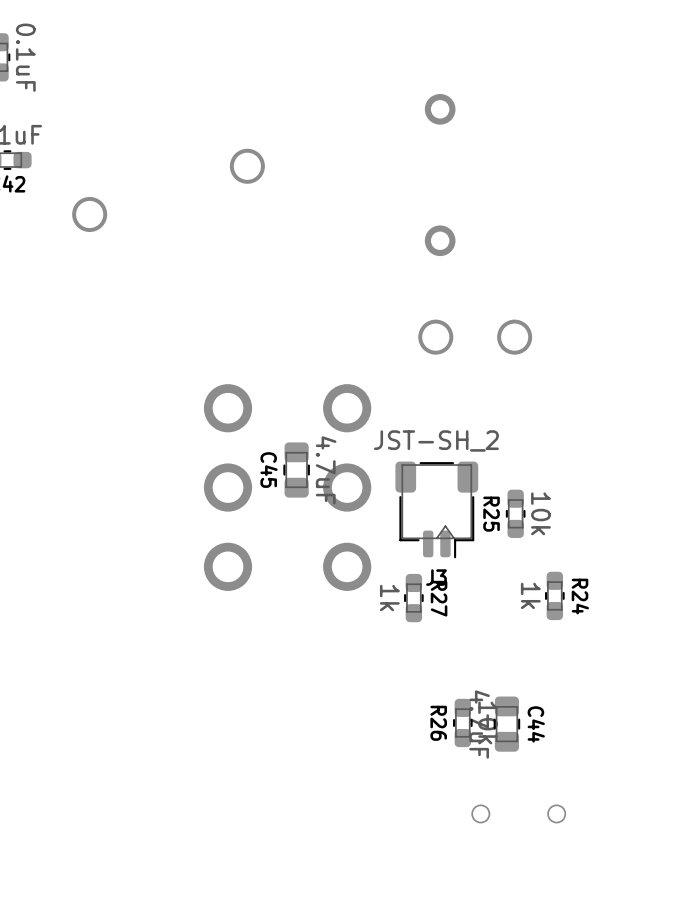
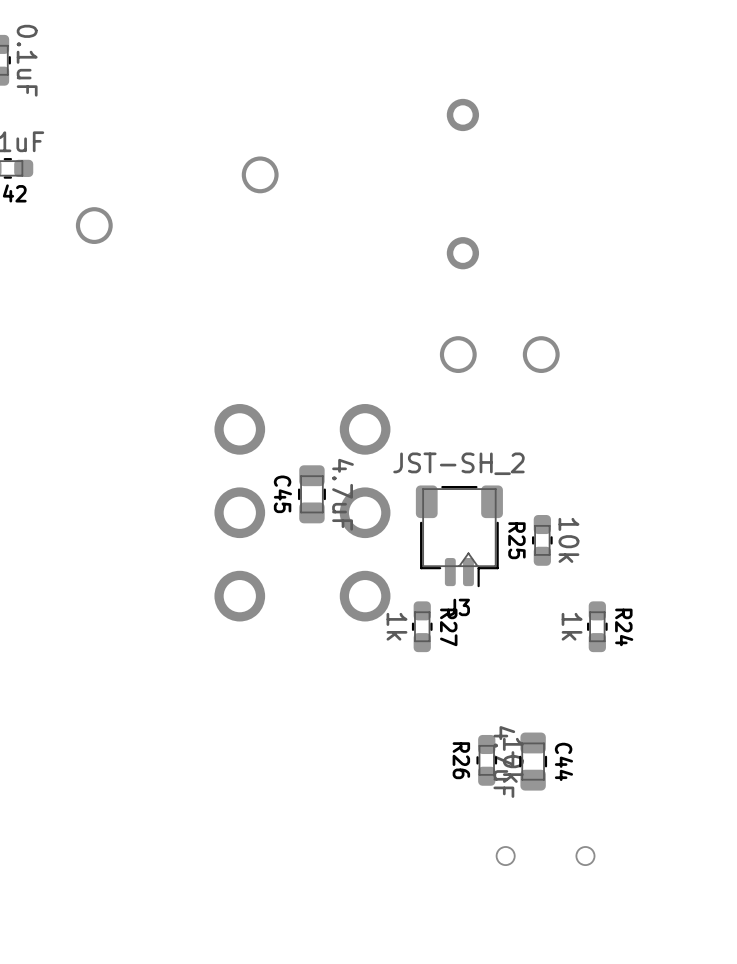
R24 position: (554, 595) -> (597, 626)
R27 position: (413, 598) -> (422, 626)

